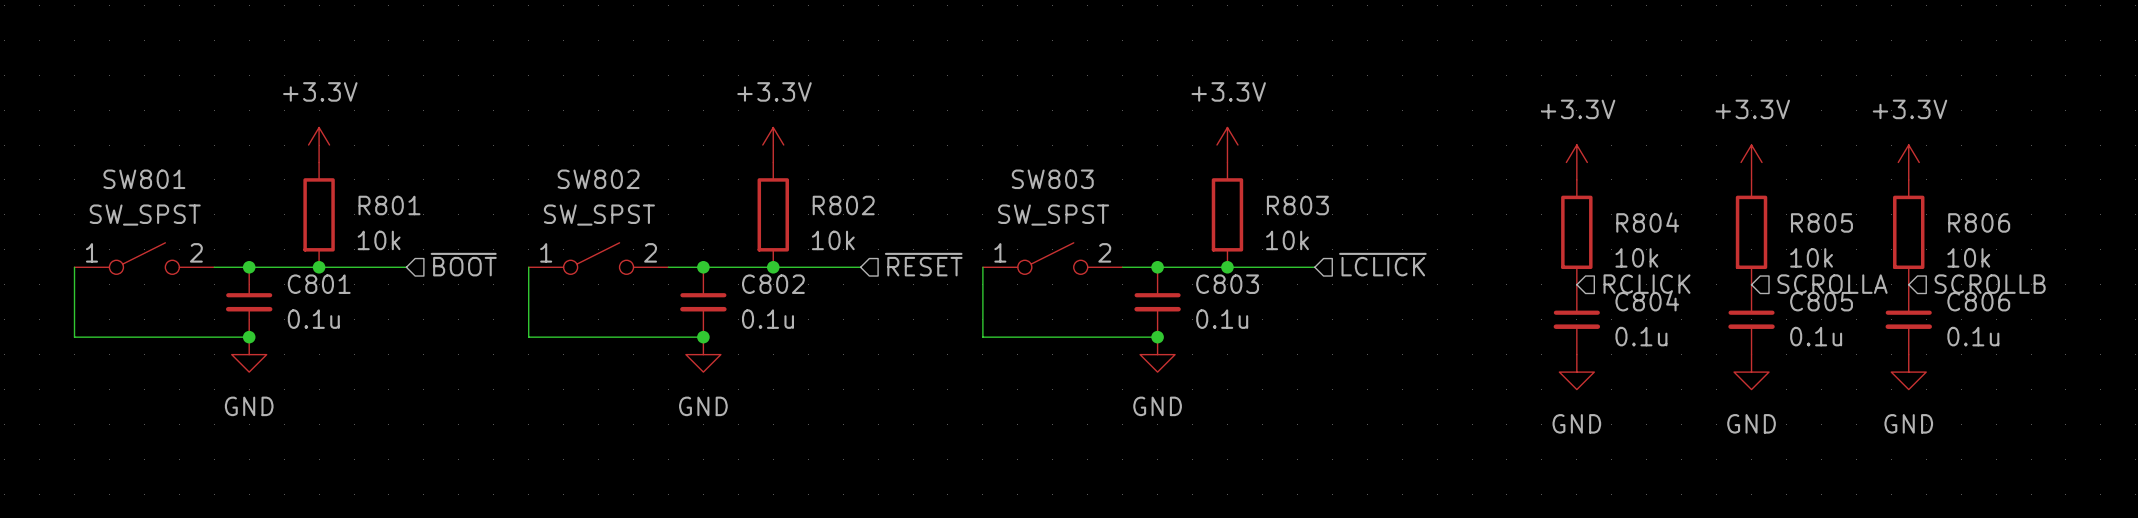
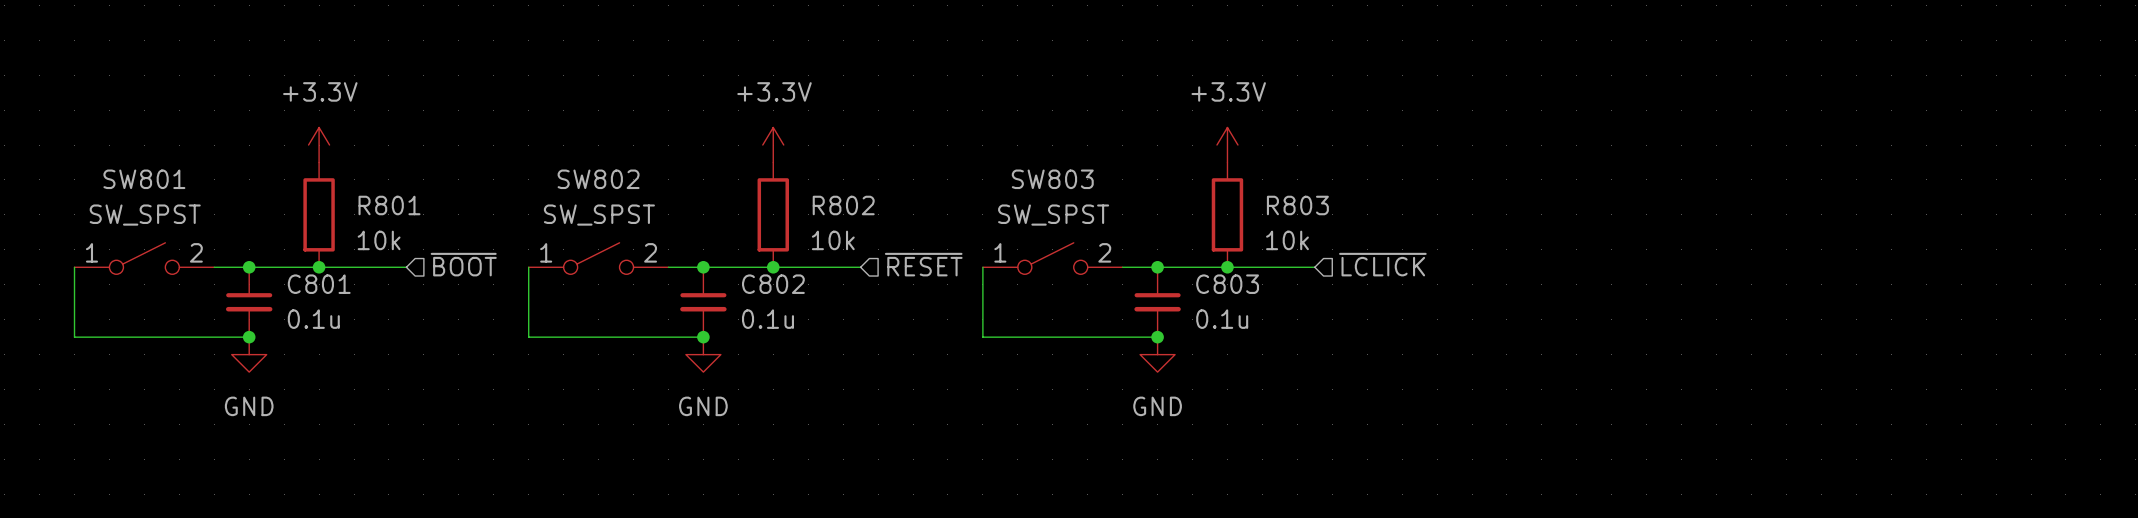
power symbol: +3.3V (1576, 162) -> none
power symbol: +3.3V (1751, 162) -> none
power symbol: +3.3V (1908, 162) -> none
R804: 10k (1576, 232) -> none
R805: 10k (1751, 232) -> none
R806: 10k (1908, 232) -> none
hierarchical label: RCLICK (1646, 284) -> none
hierarchical label: SCROLLA (1832, 284) -> none
hierarchical label: SCROLLB (1990, 284) -> none
C804: 0.1u (1576, 319) -> none
C805: 0.1u (1751, 319) -> none
C806: 0.1u (1908, 319) -> none
power symbol: GND (1576, 372) -> none
power symbol: GND (1751, 372) -> none
power symbol: GND (1908, 372) -> none

